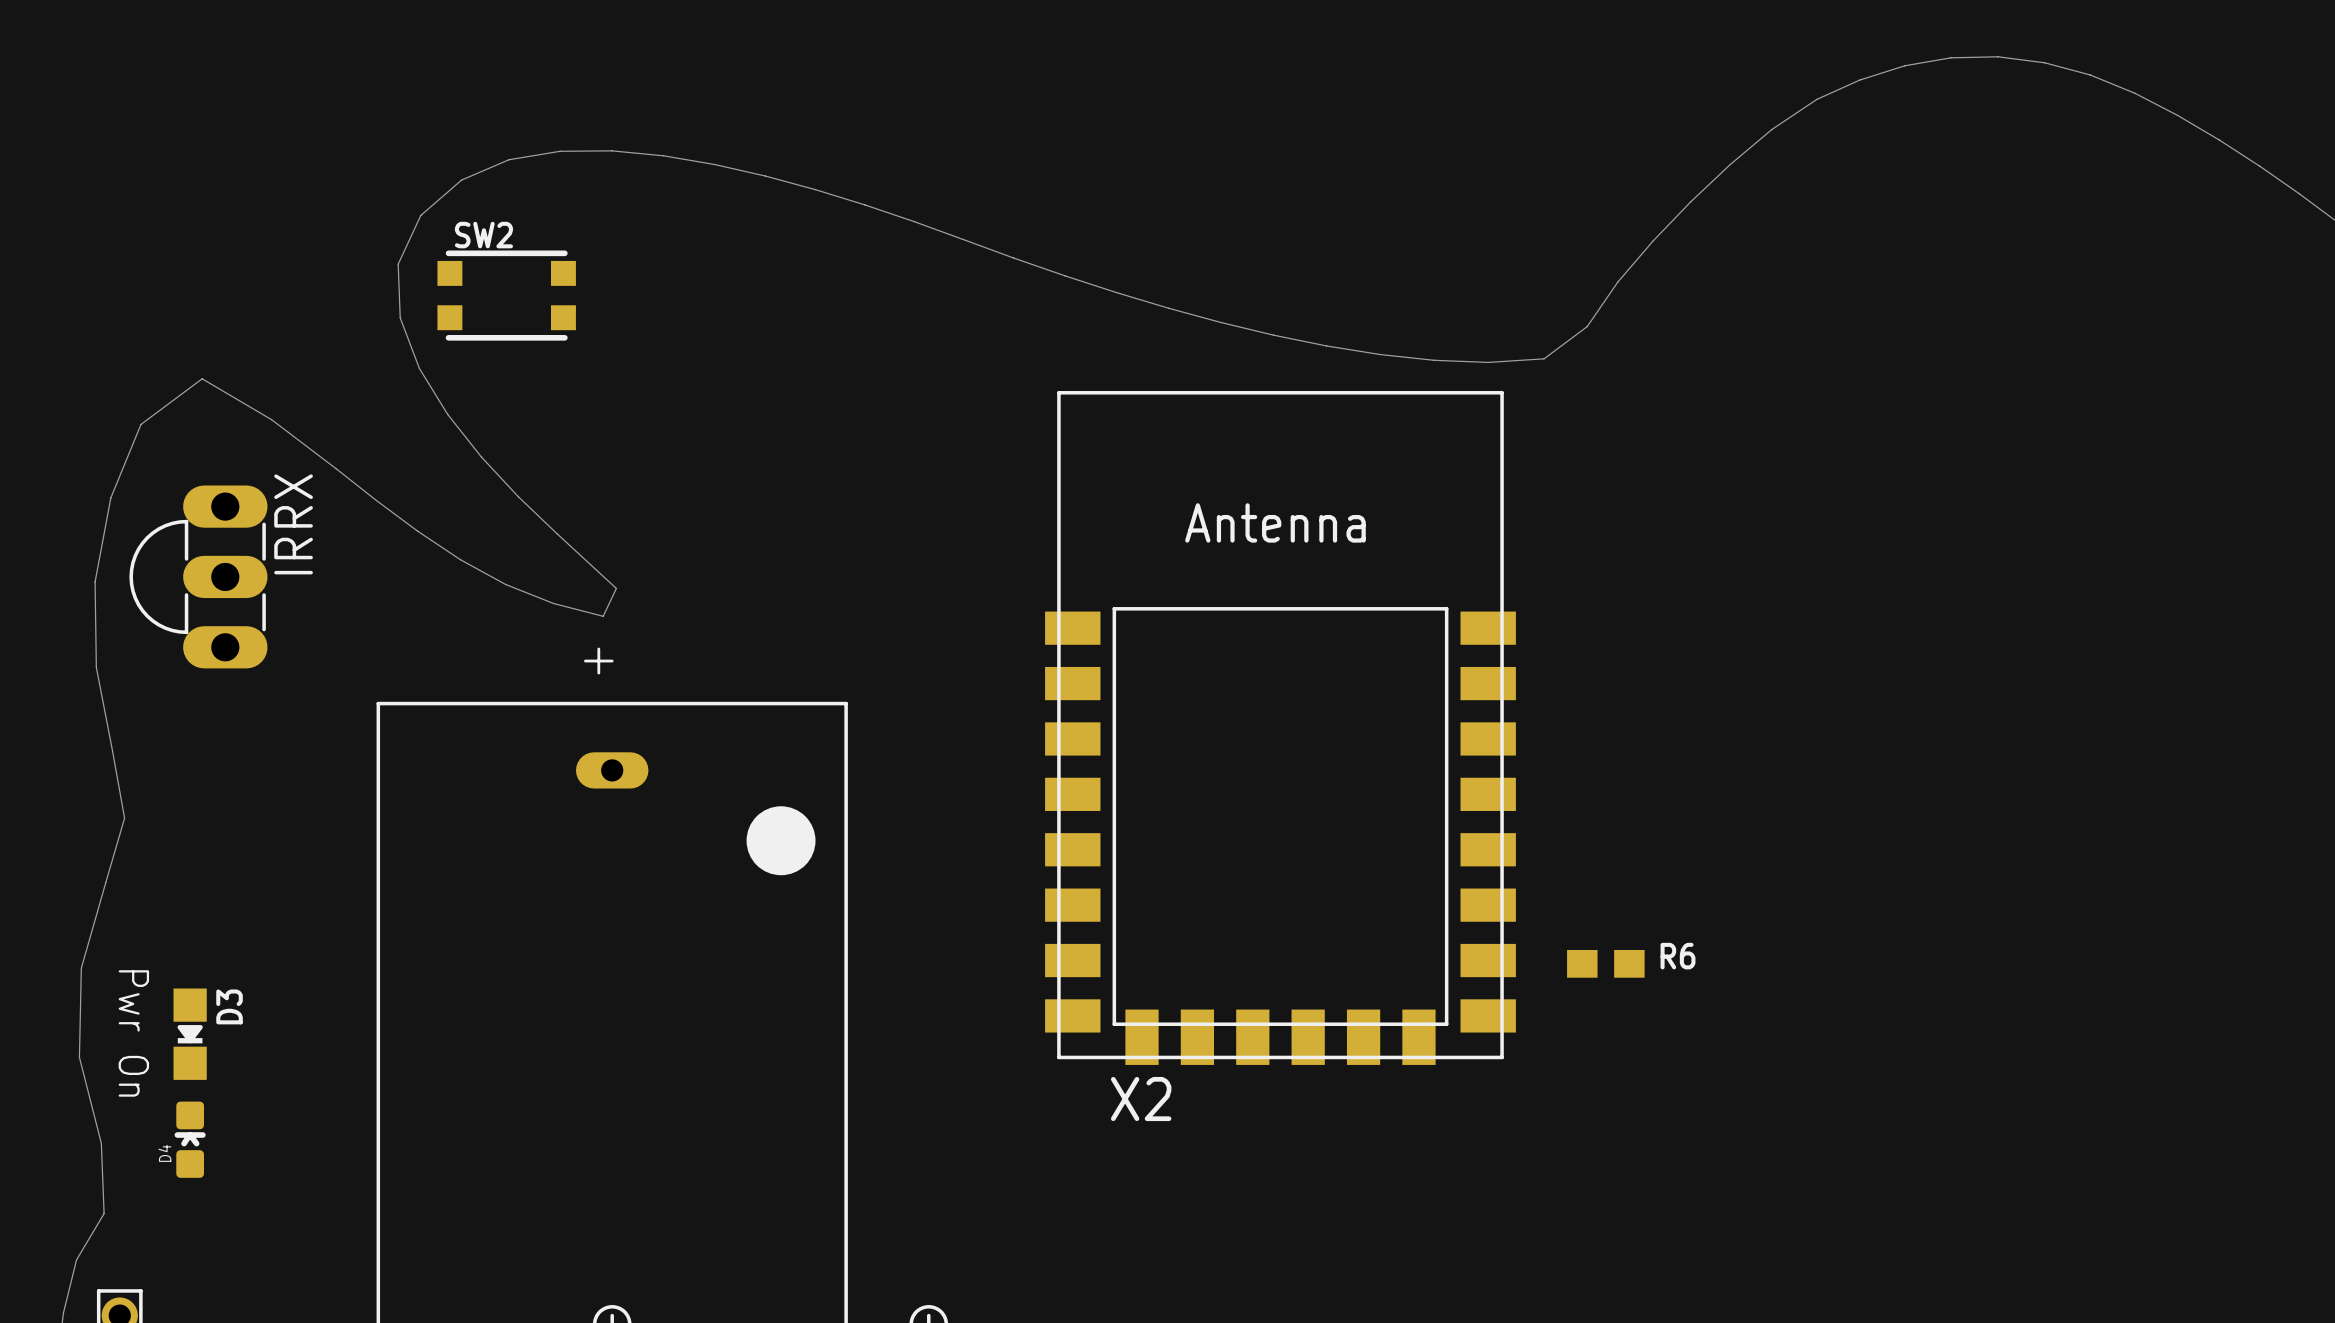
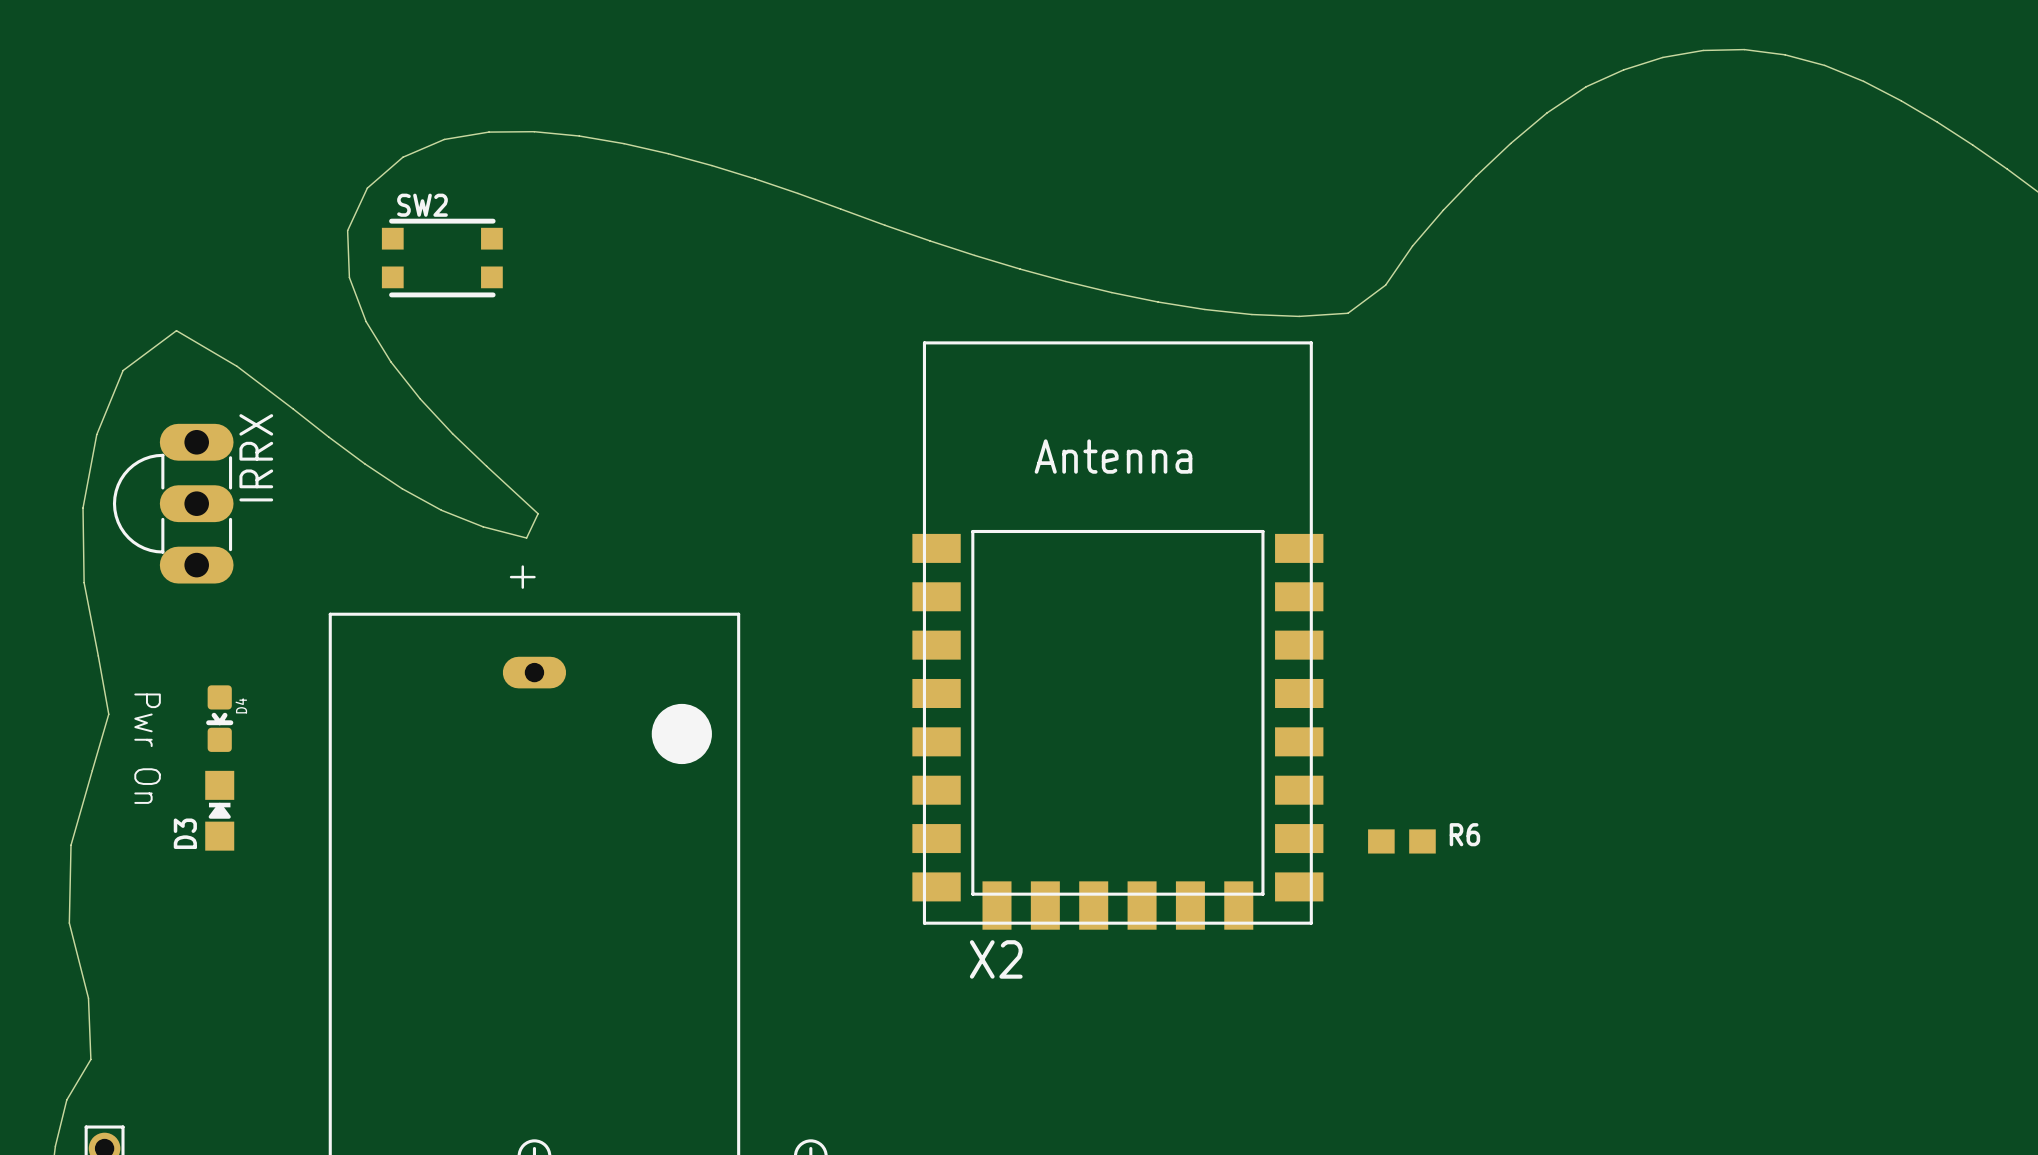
text position: Pwr On (133, 1033) -> Pwr On (147, 748)
D3 rotation: 0° (190, 1034) -> 180° (219, 810)
D3 position: (190, 1034) -> (219, 810)
D4 rotation: 0° (190, 1139) -> 180° (219, 718)
D4 position: (190, 1139) -> (219, 718)

